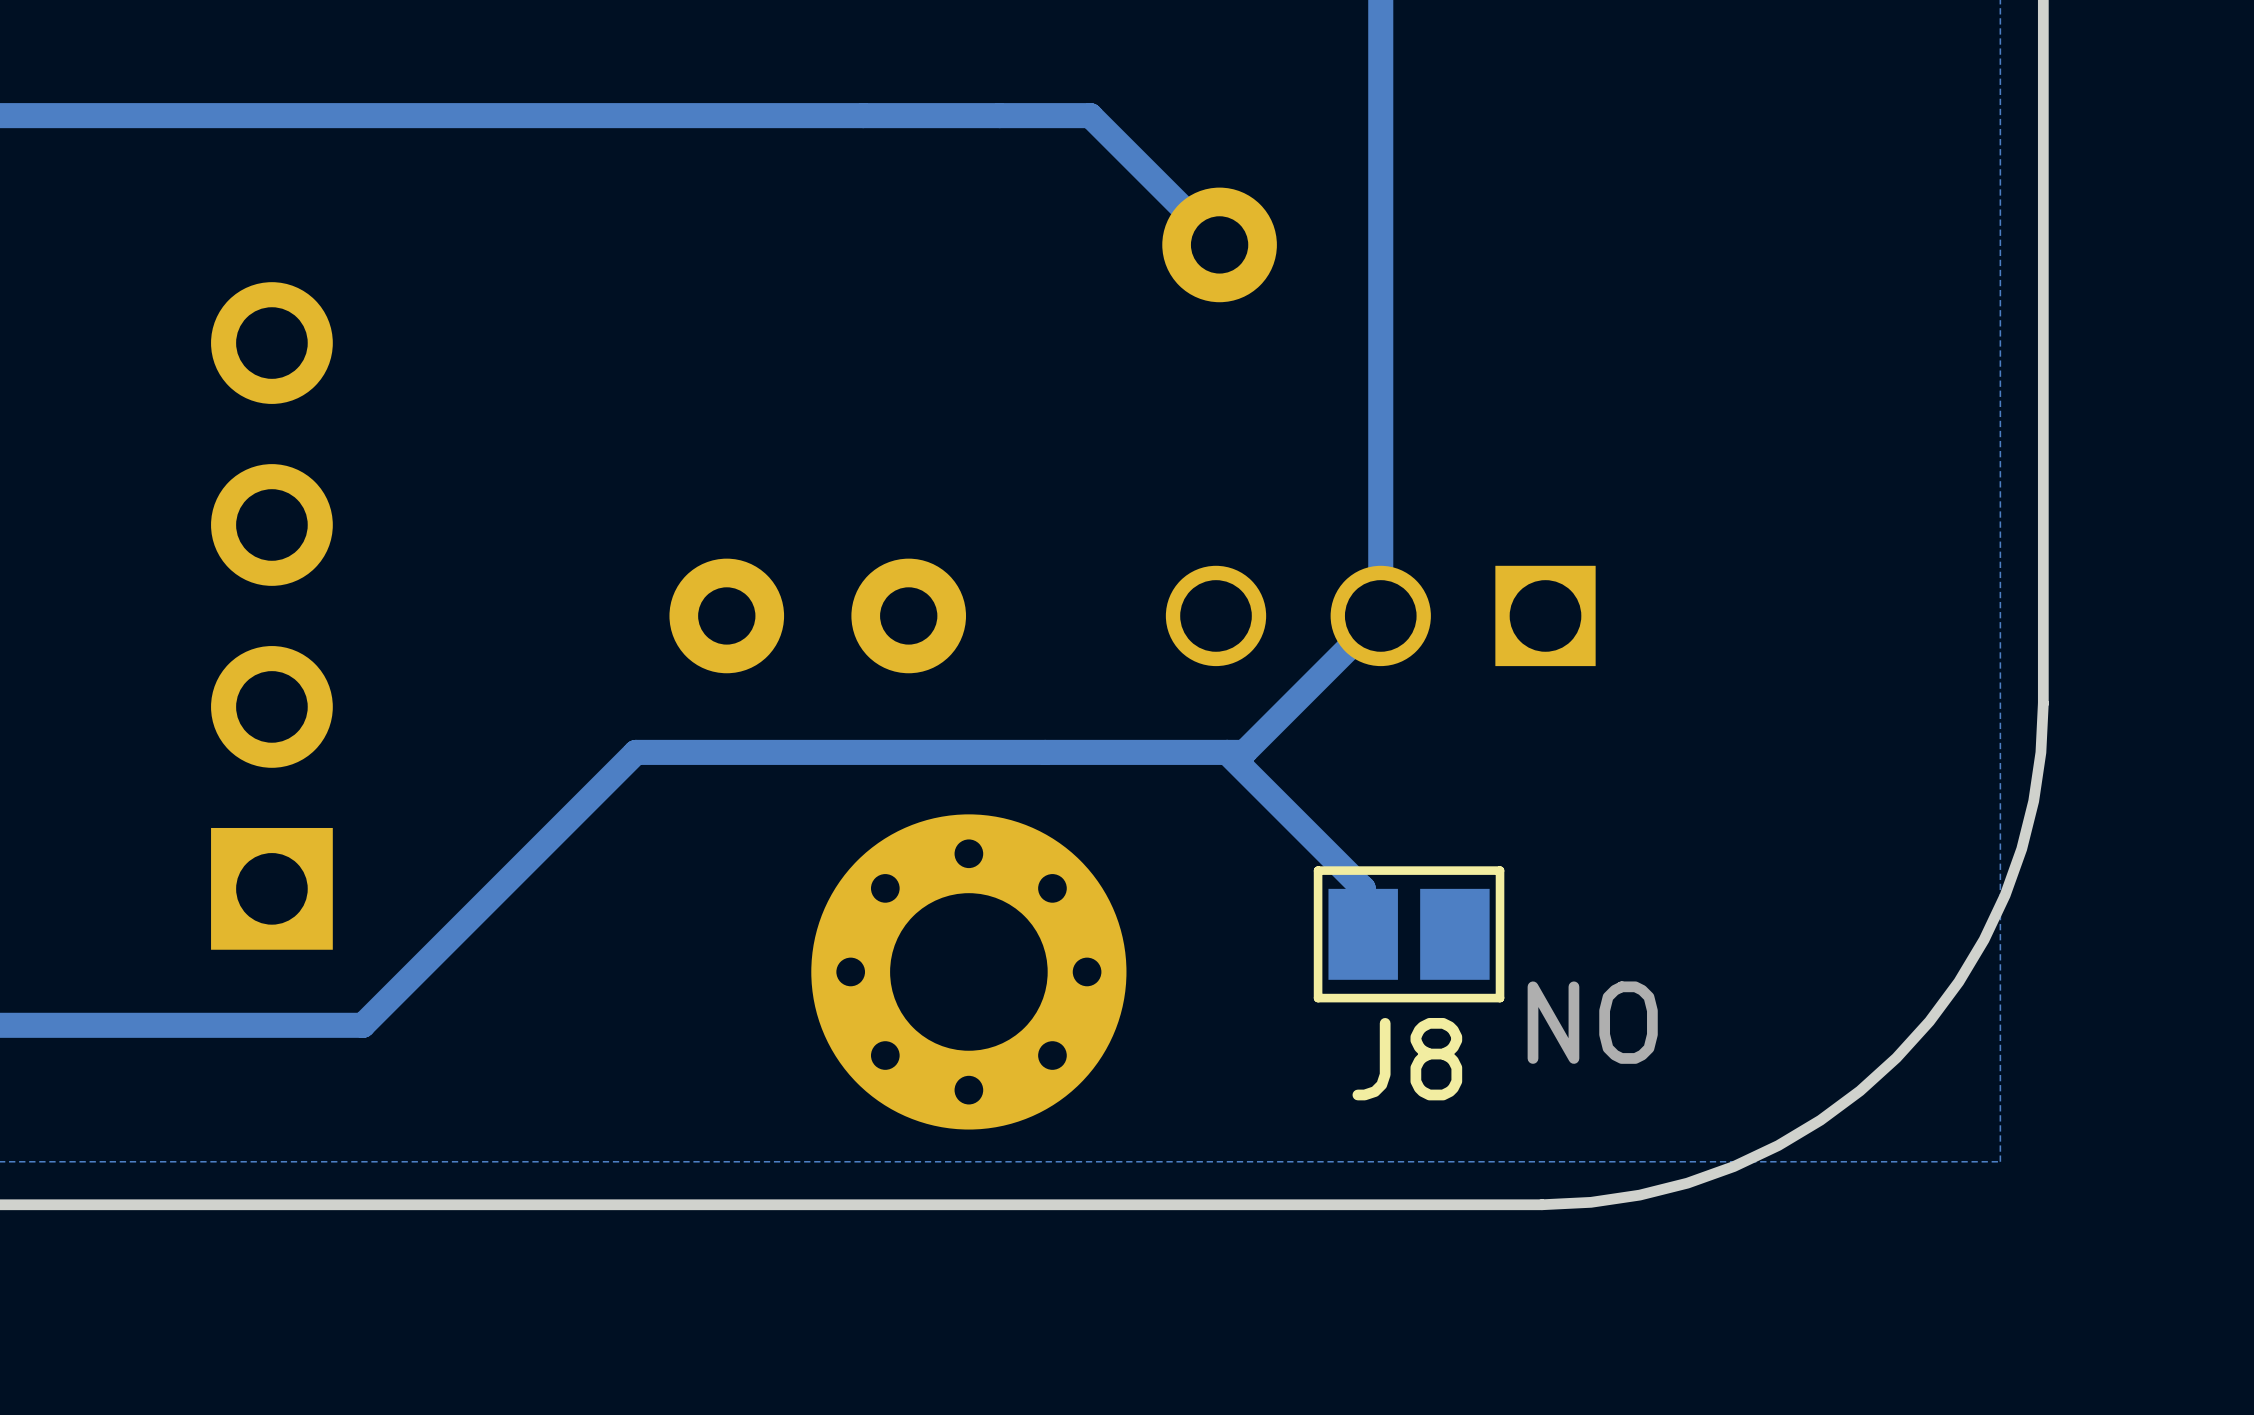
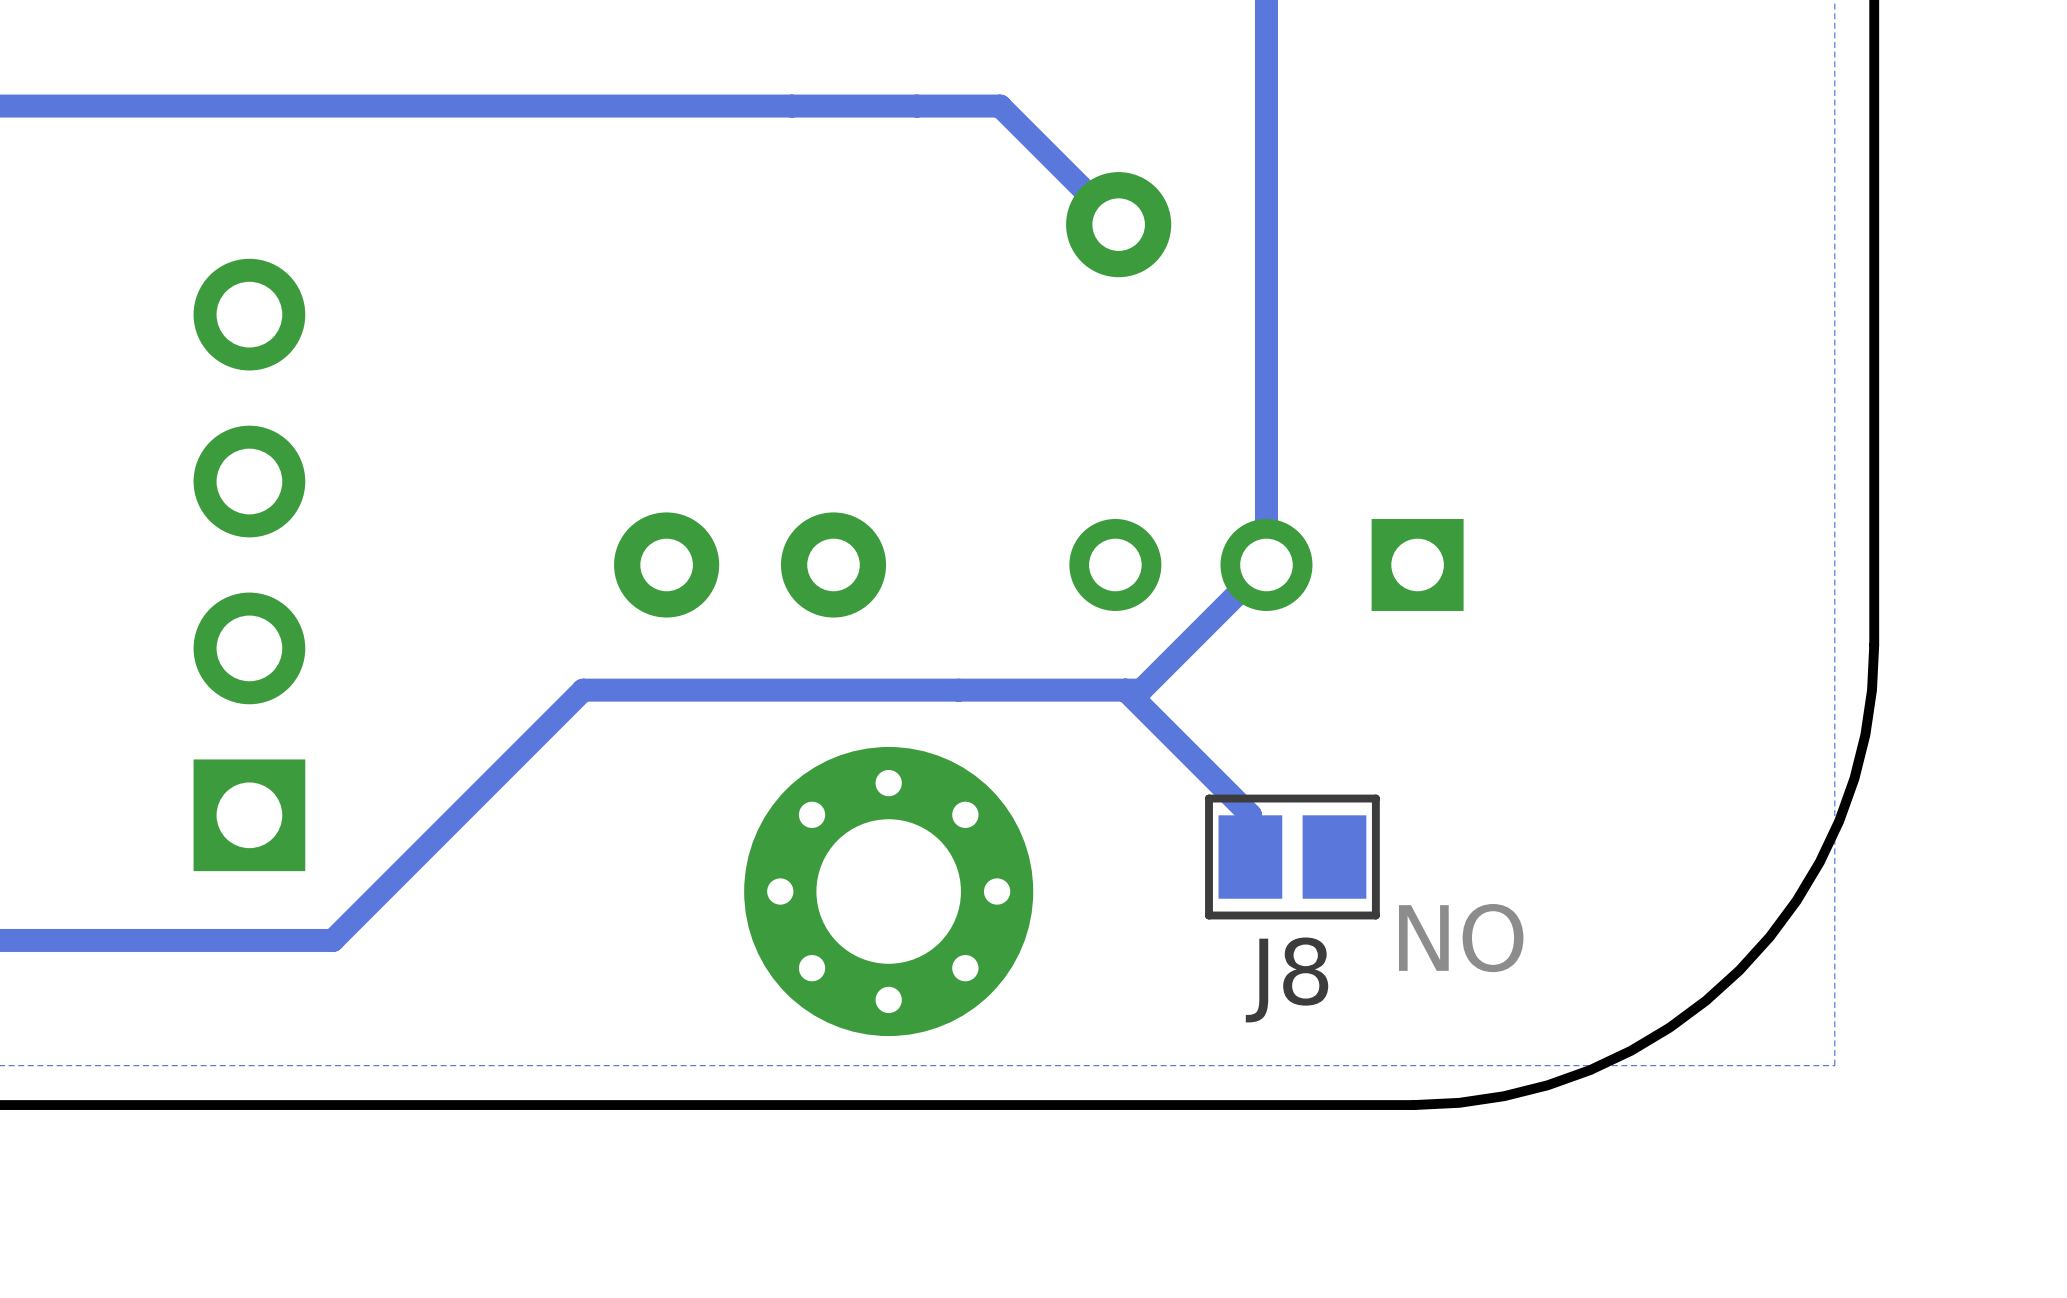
part footprint: [1165, 565, 1596, 667] -> [1069, 518, 1464, 611]

